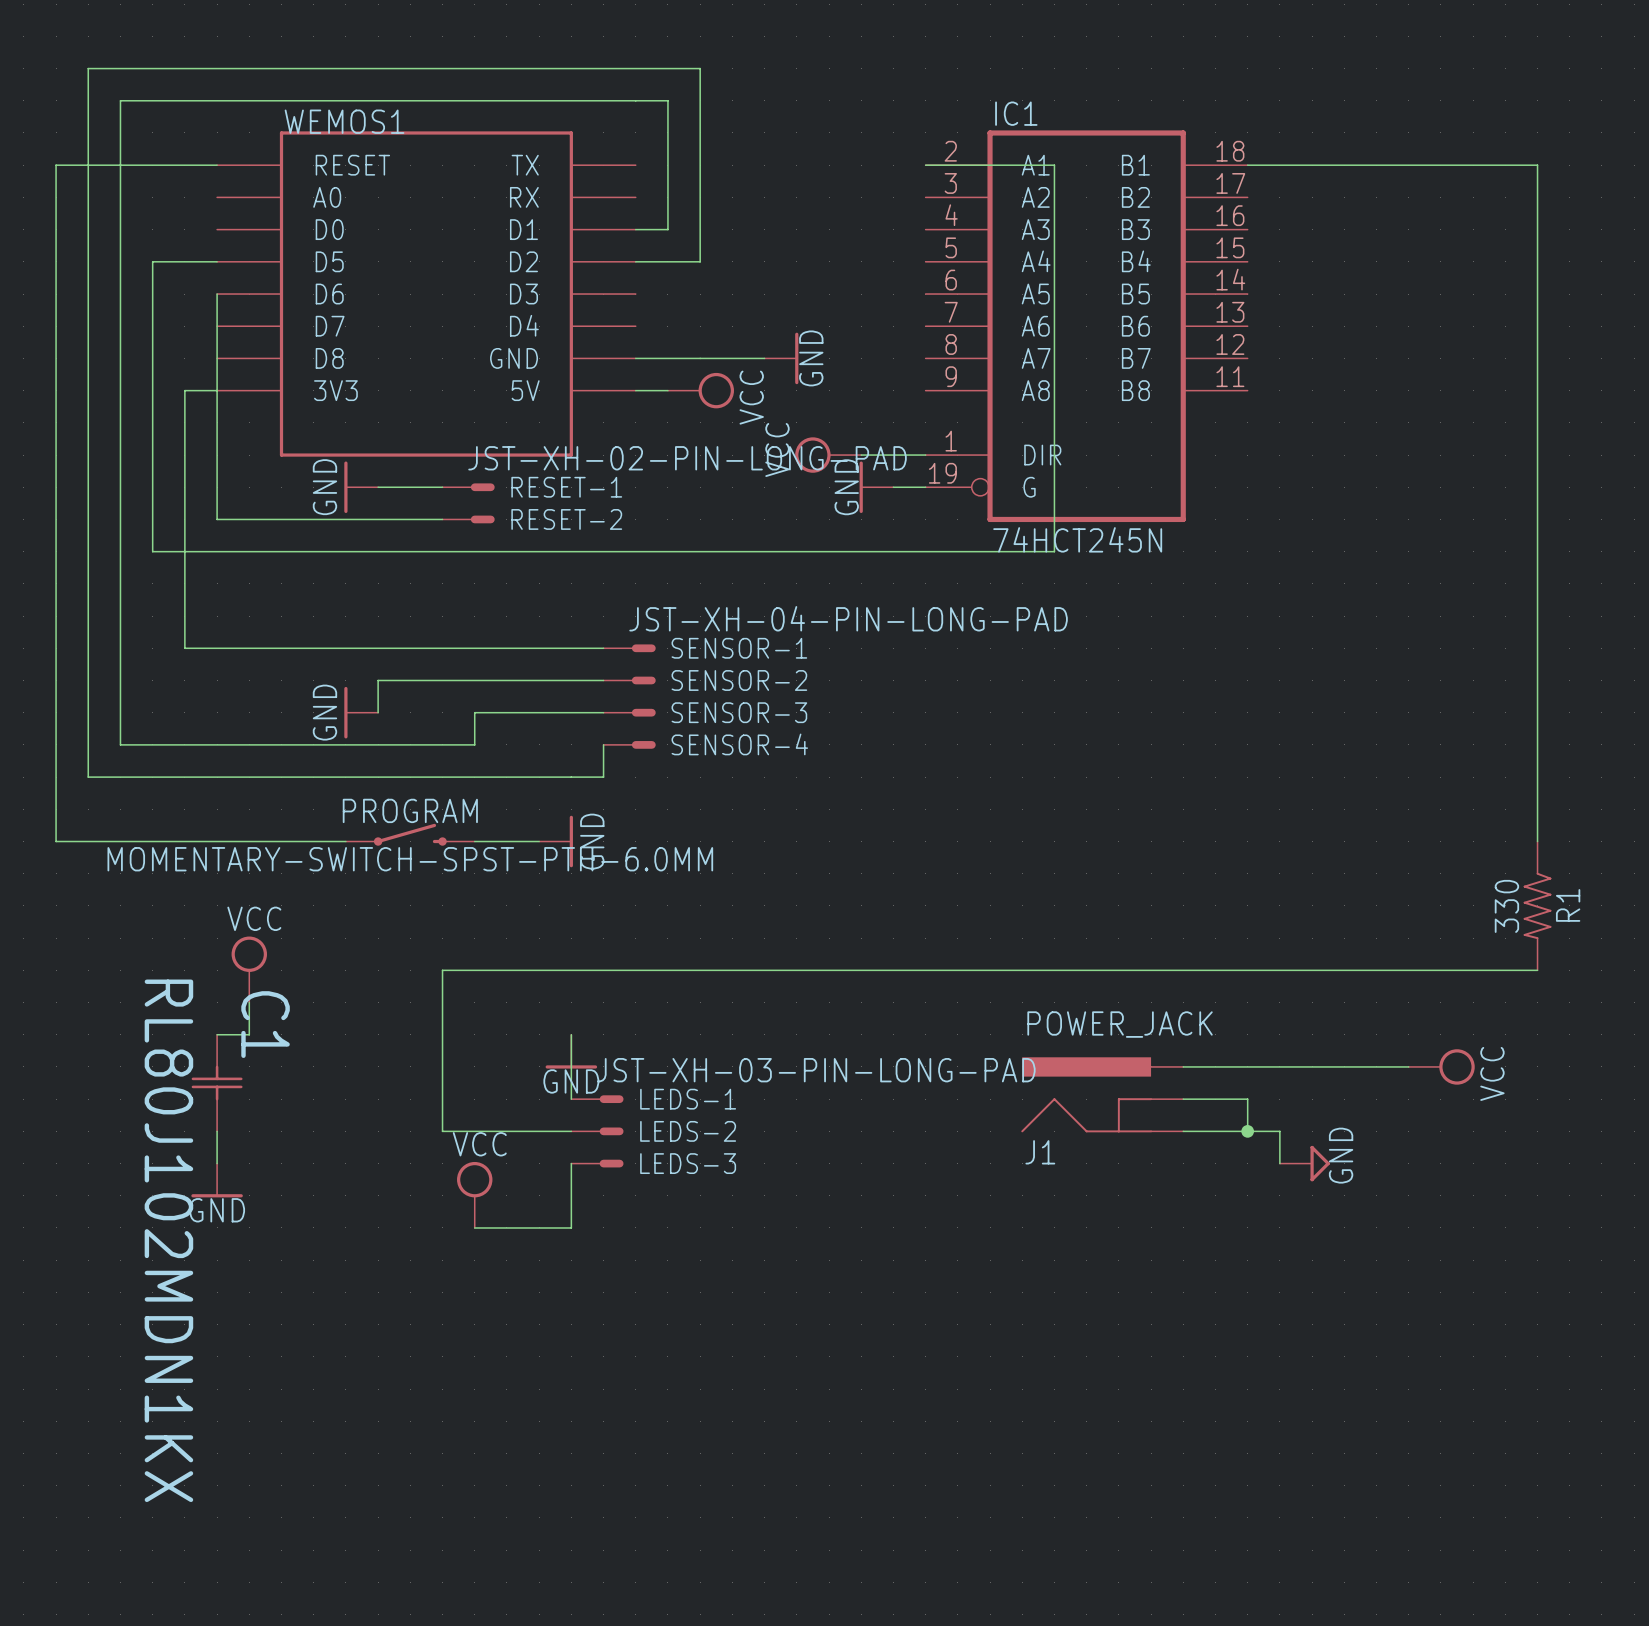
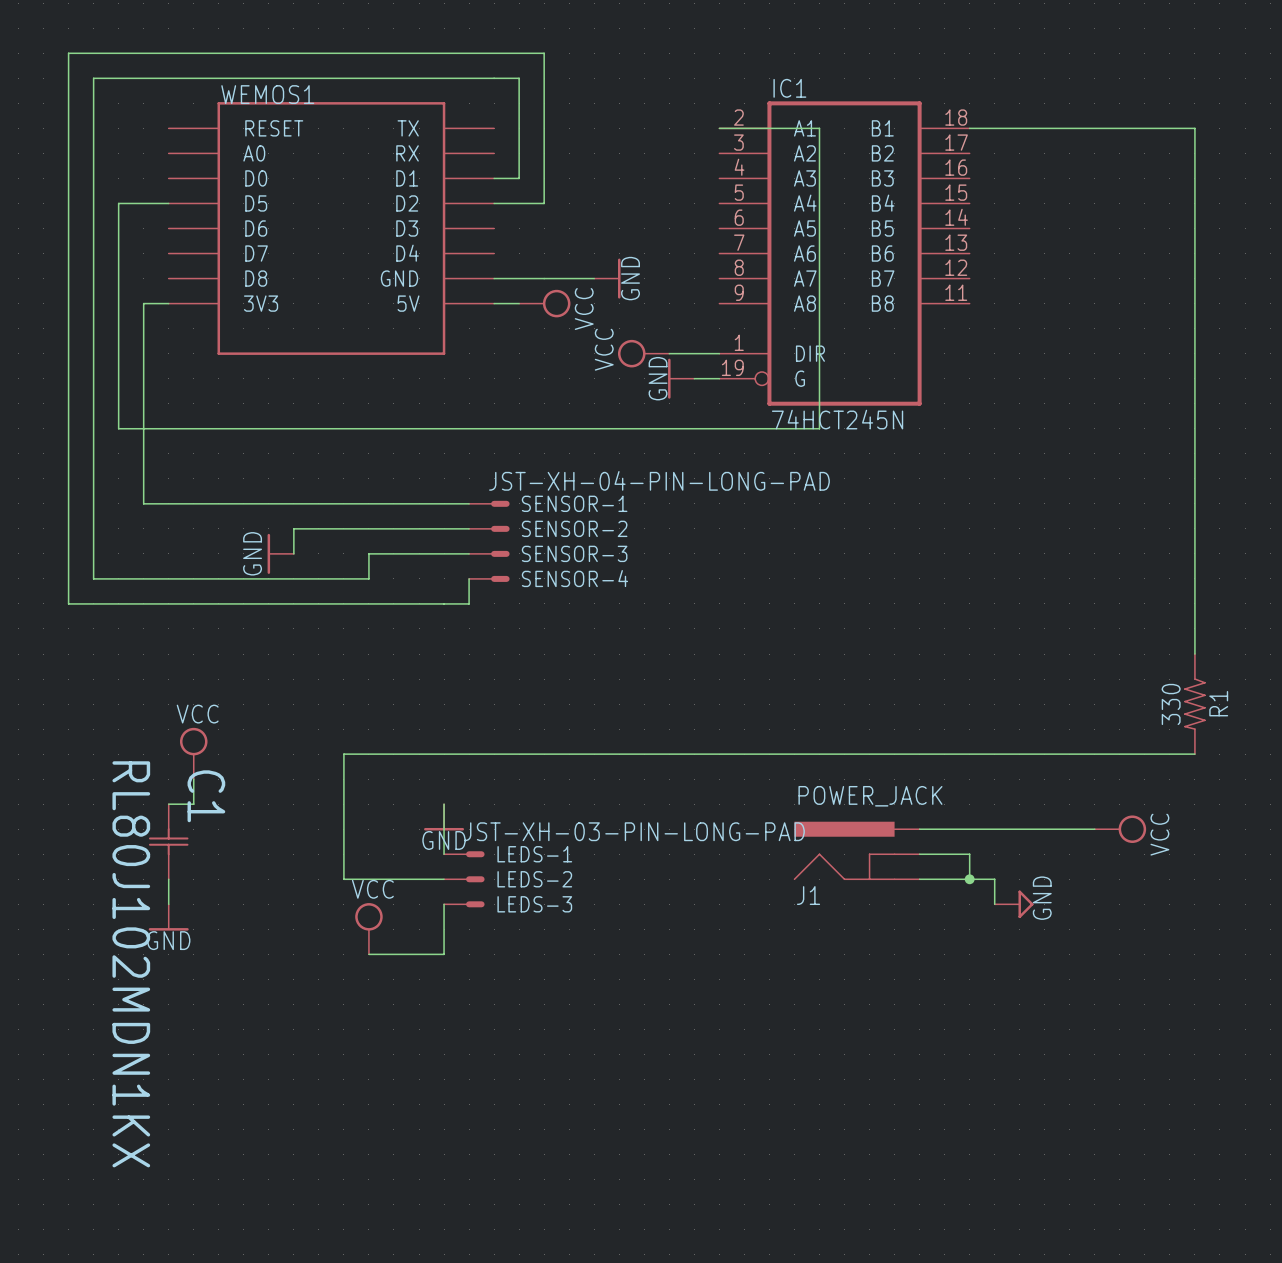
wire: (217, 165) (56, 165) (56, 841) (345, 841) -> none
wire: (217, 294) (217, 519) (442, 519) -> none
power symbol: GND (361, 487) -> none
wire: (378, 487) (442, 487) -> none
RESET-1: JST-XH-02-PIN-LONG-PAD (468, 487) -> none
RESET-2: (468, 519) -> none
PROGRAM: MOMENTARY-SWITCH-SPST-PTH-6.0MM (410, 834) -> none
wire: (474, 841) (539, 841) -> none
power symbol: GND (556, 841) -> none

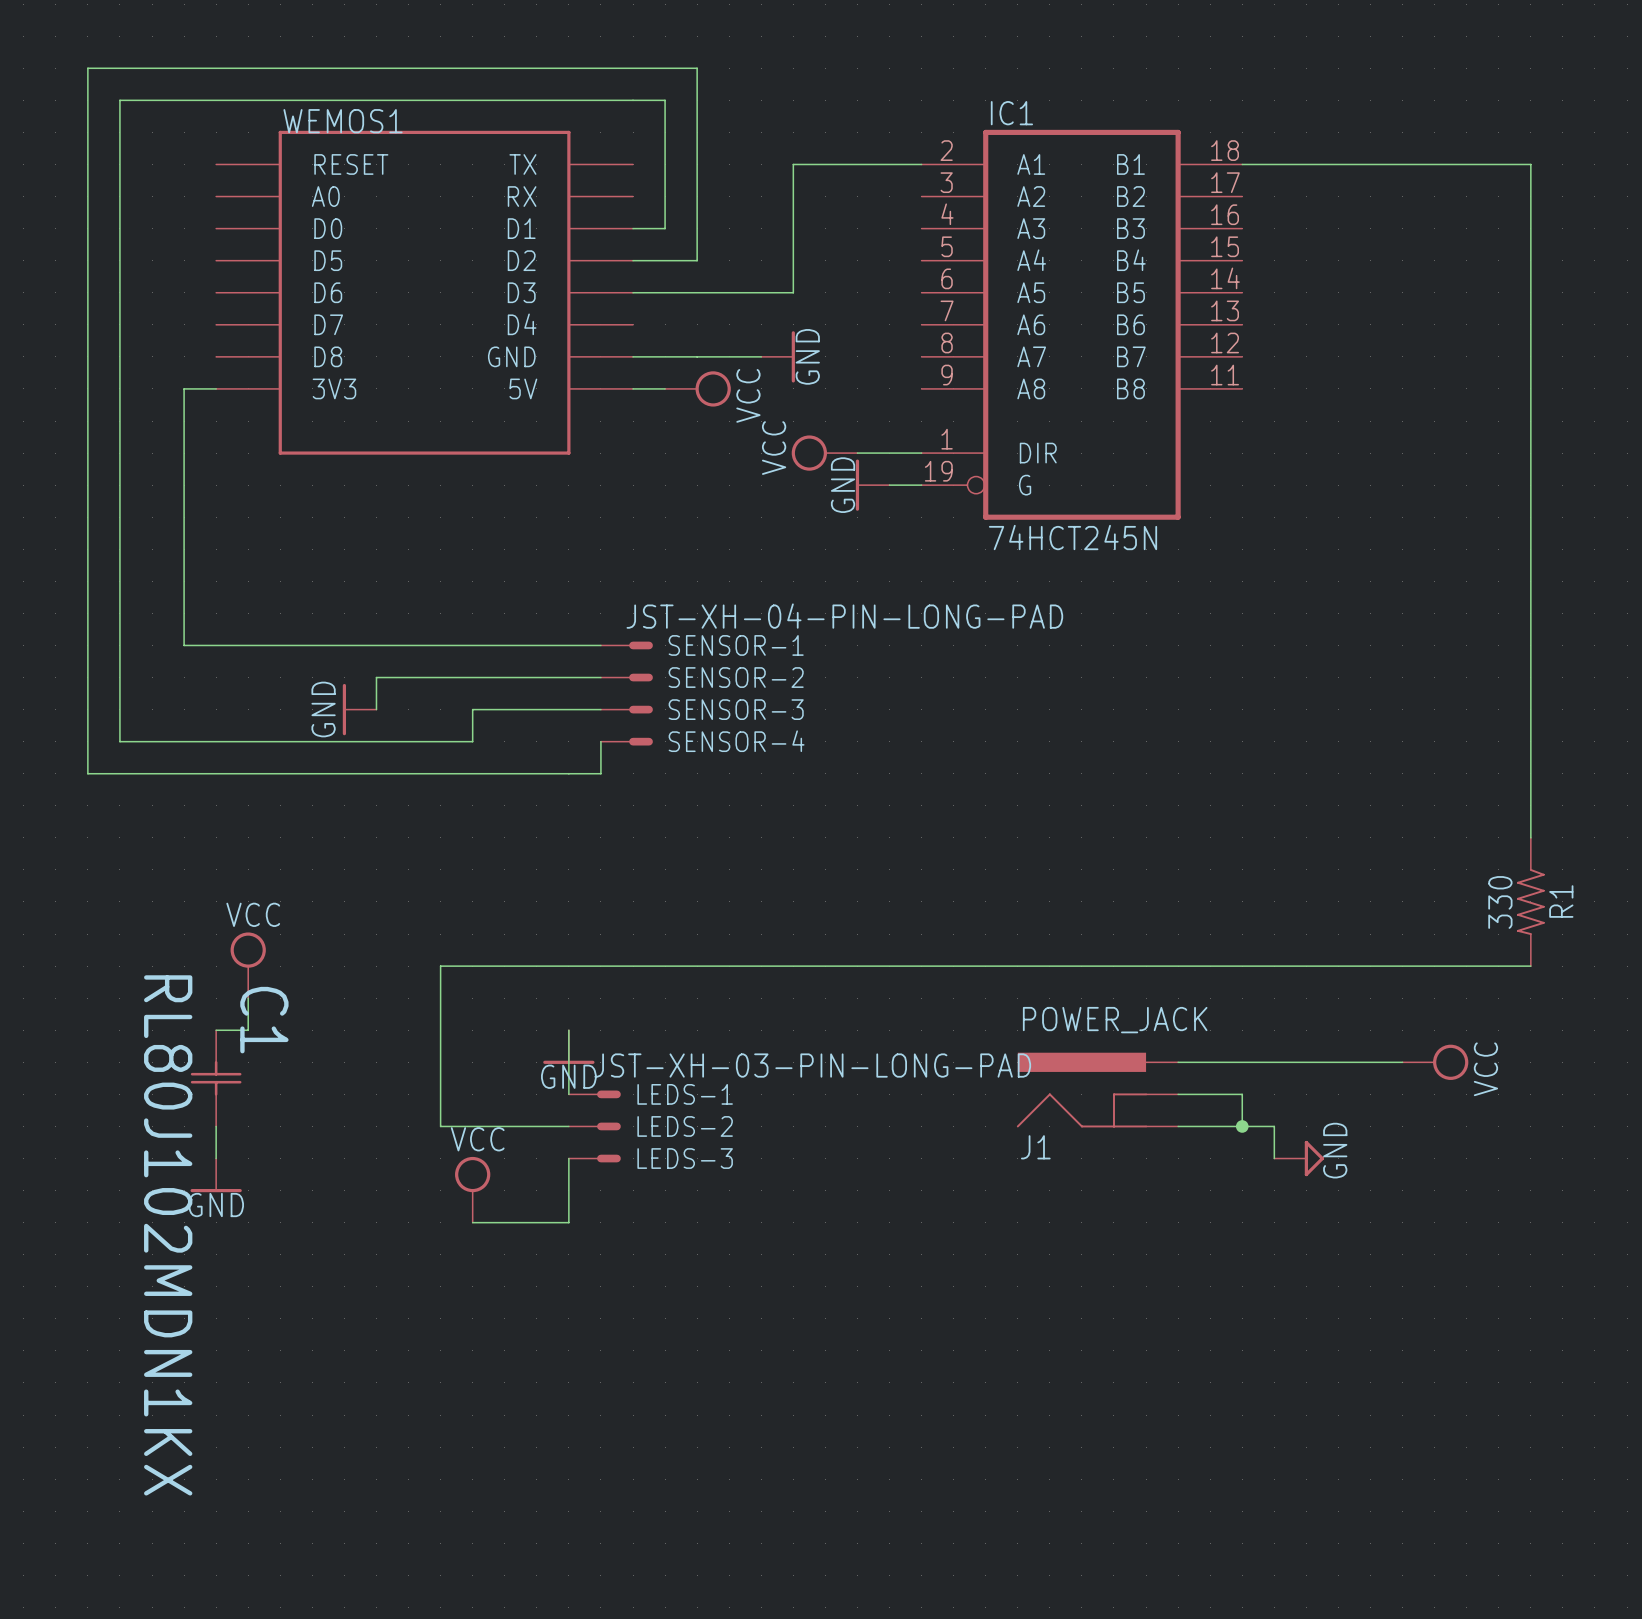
wire: (719, 128) (819, 128) (819, 428) (118, 428) (118, 203) (168, 203) -> (921, 164) (793, 164) (793, 292) (633, 292)

